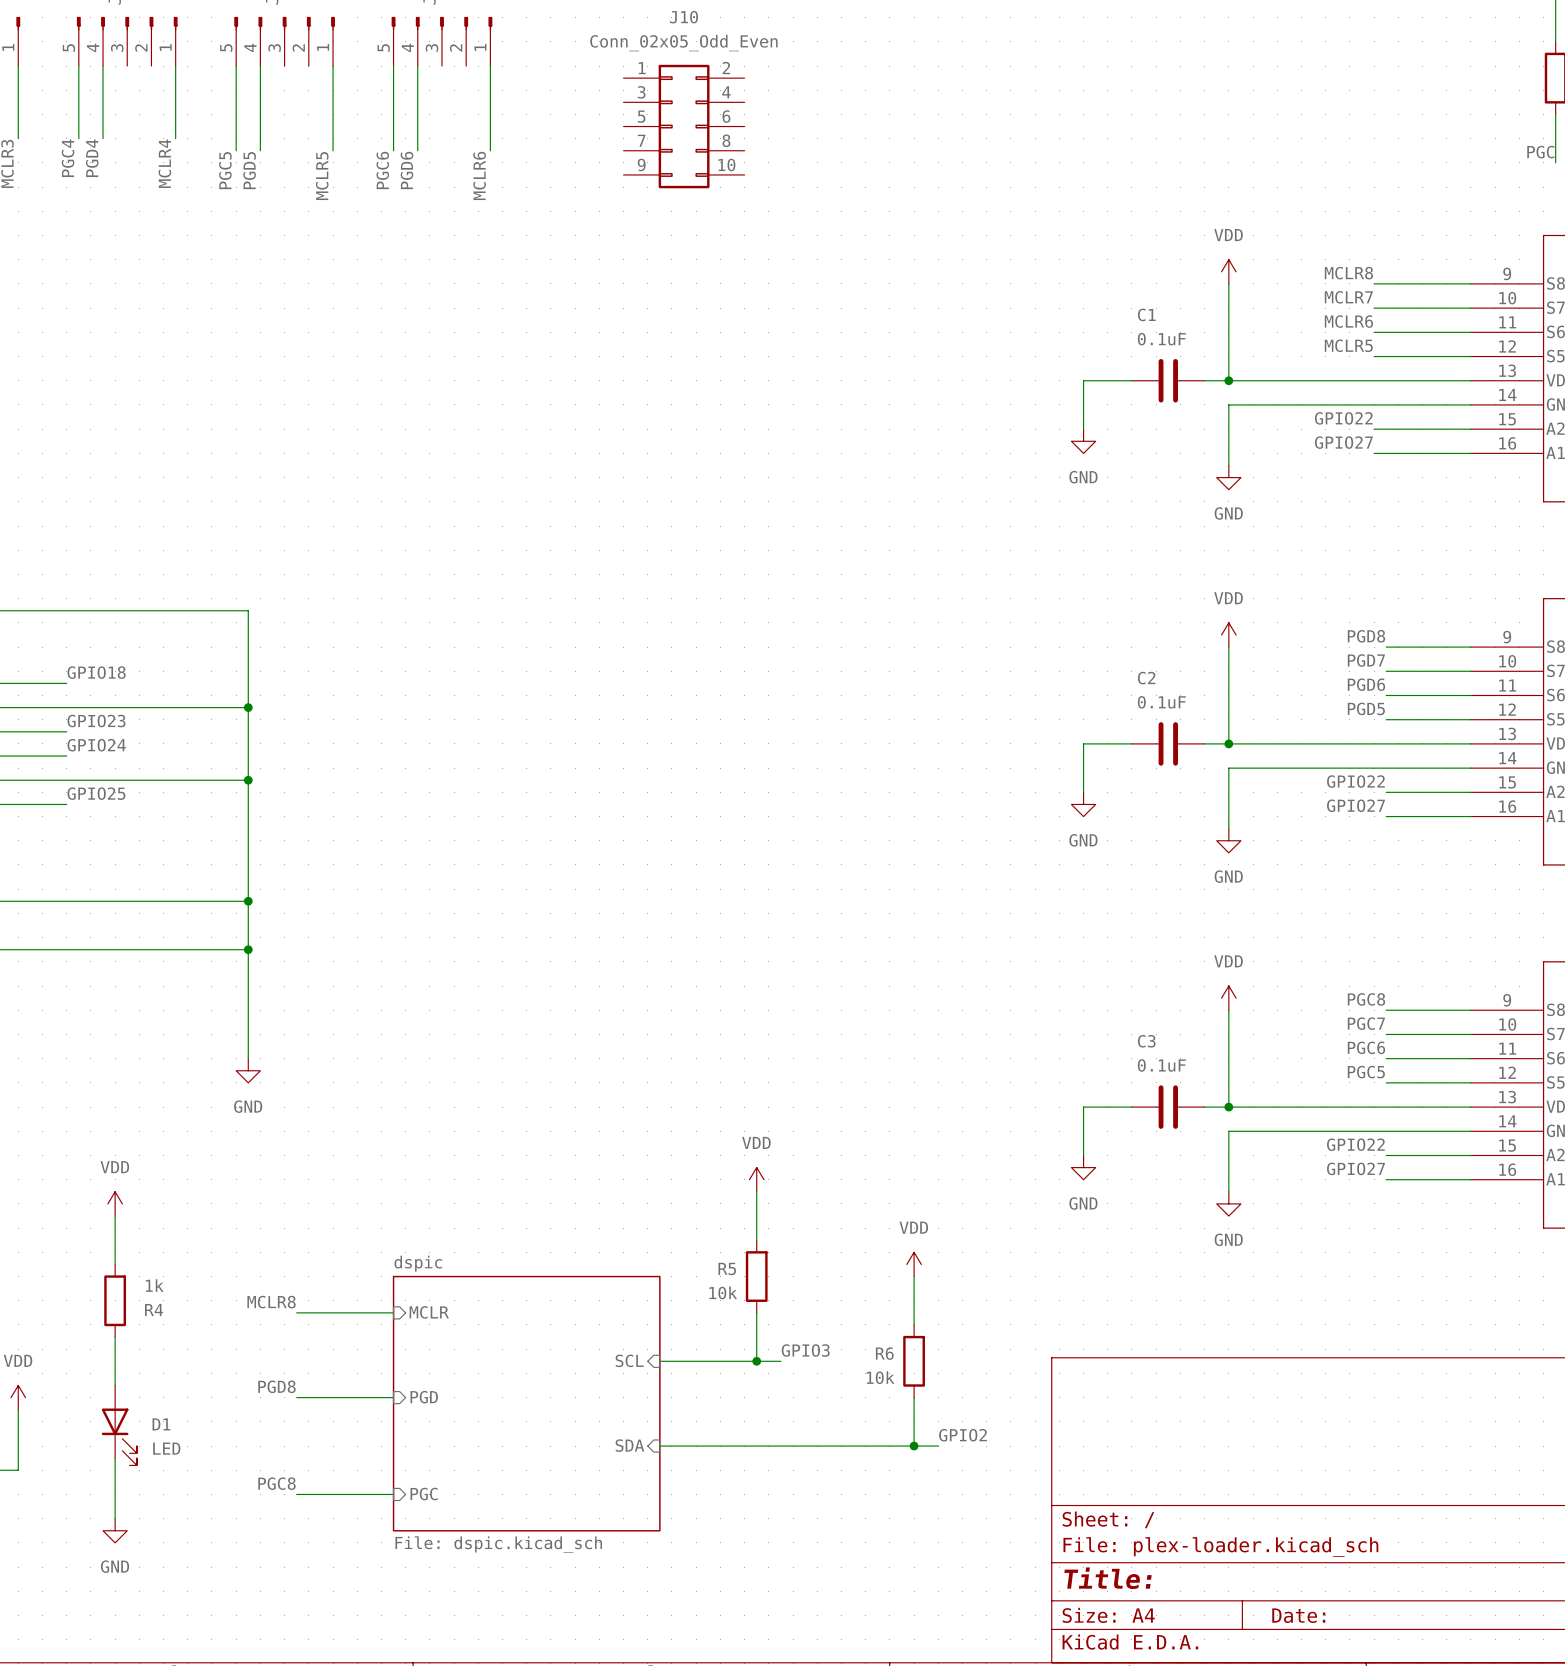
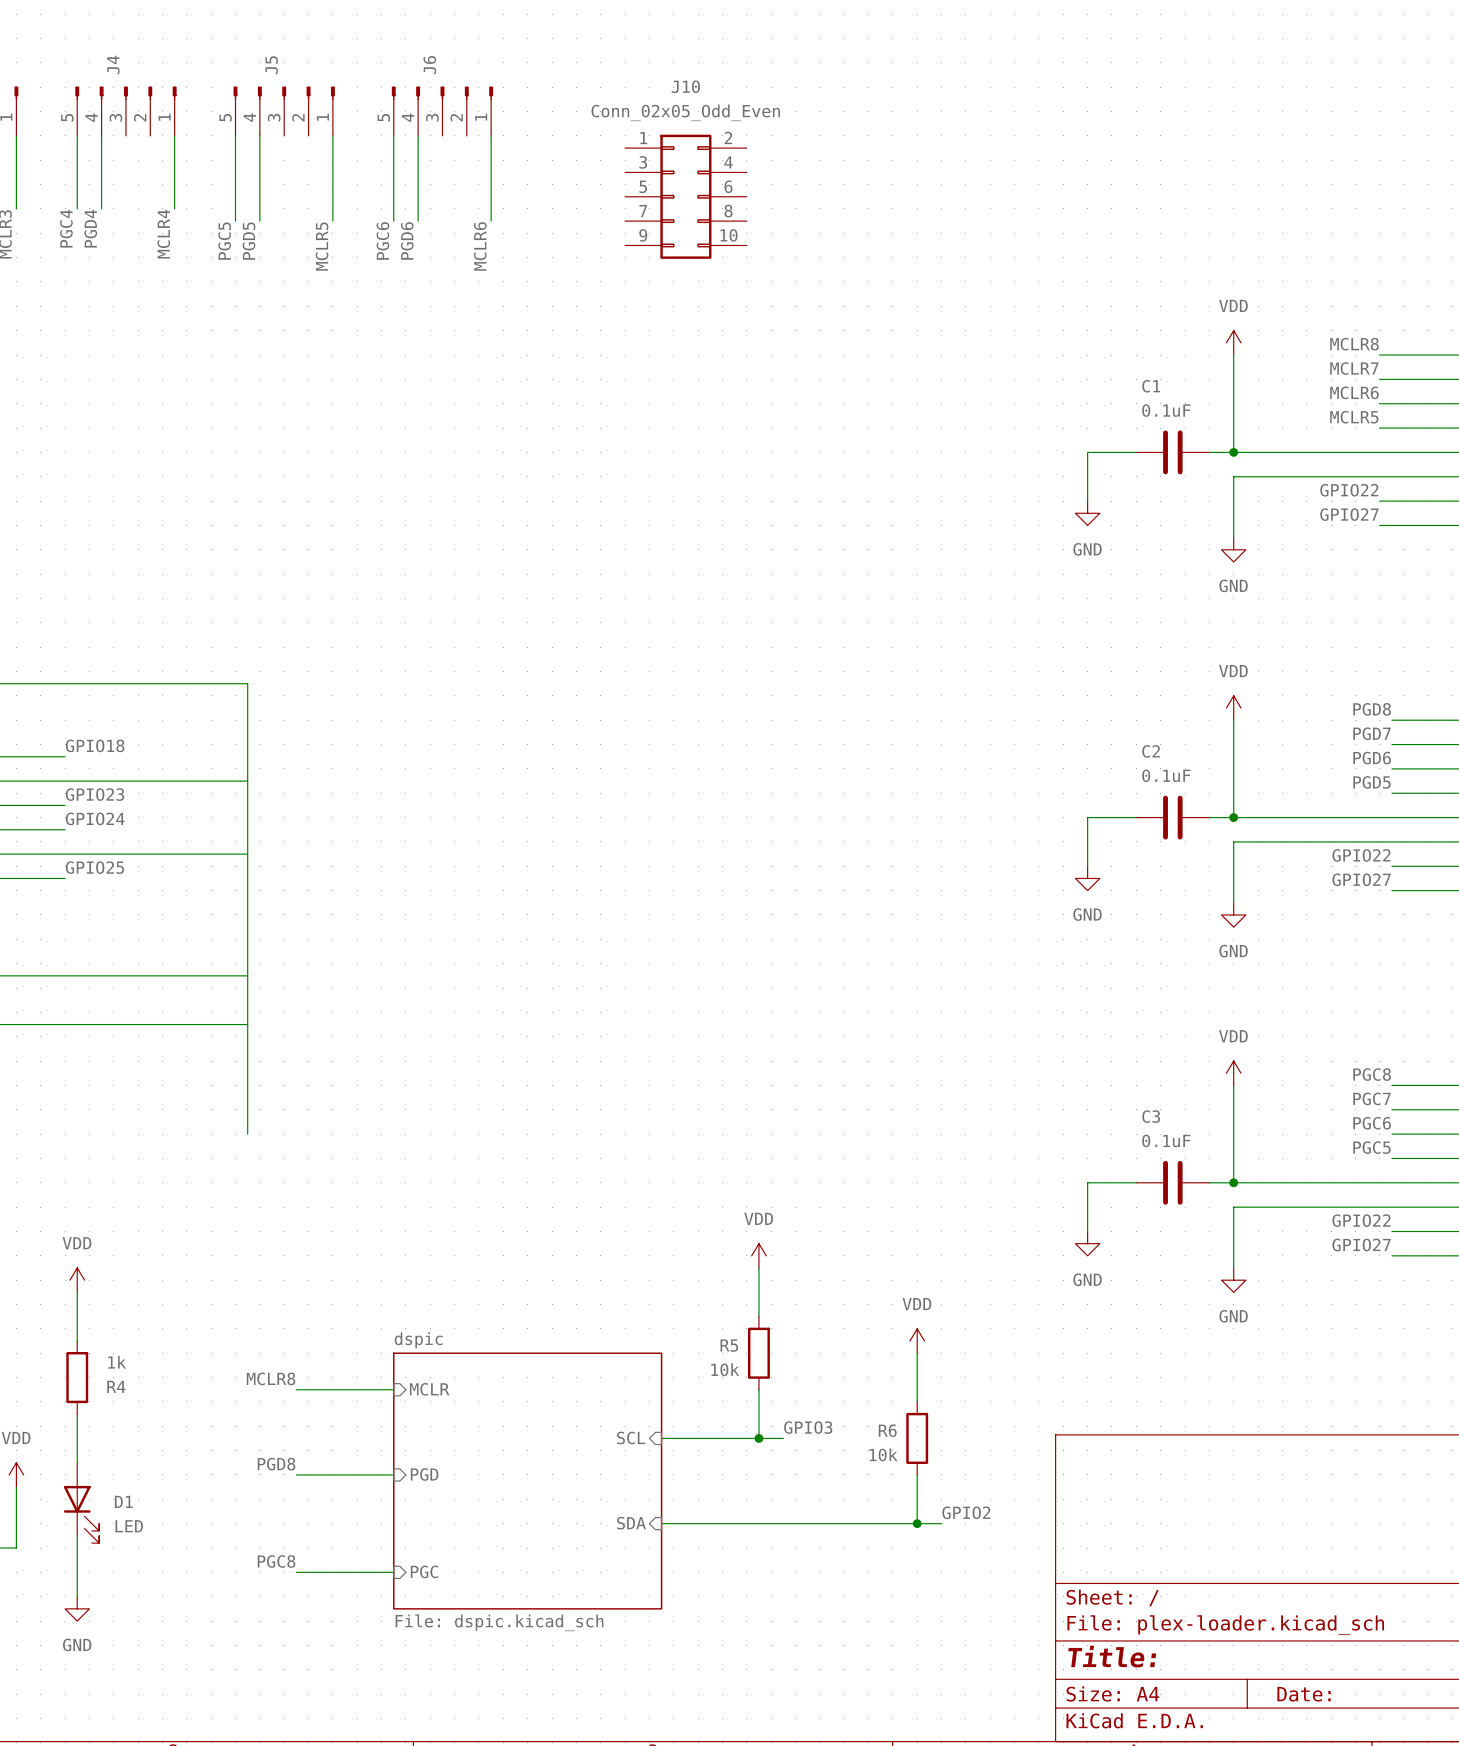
junction: (248, 707) -> none
junction: (248, 780) -> none
junction: (248, 901) -> none
junction: (248, 949) -> none
power symbol: GND (248, 1070) -> none
power symbol position: VDD (115, 1203) -> VDD (77, 1280)
wire: (115, 1216) (115, 1264) -> (77, 1292) (77, 1341)
R4 position: (115, 1300) -> (77, 1377)
wire: (115, 1337) (115, 1385) -> (77, 1414) (77, 1462)
D1 position: (119, 1425) -> (81, 1502)
wire: (115, 1458) (115, 1518) -> (77, 1535) (77, 1596)
power symbol position: GND (115, 1530) -> GND (77, 1608)

